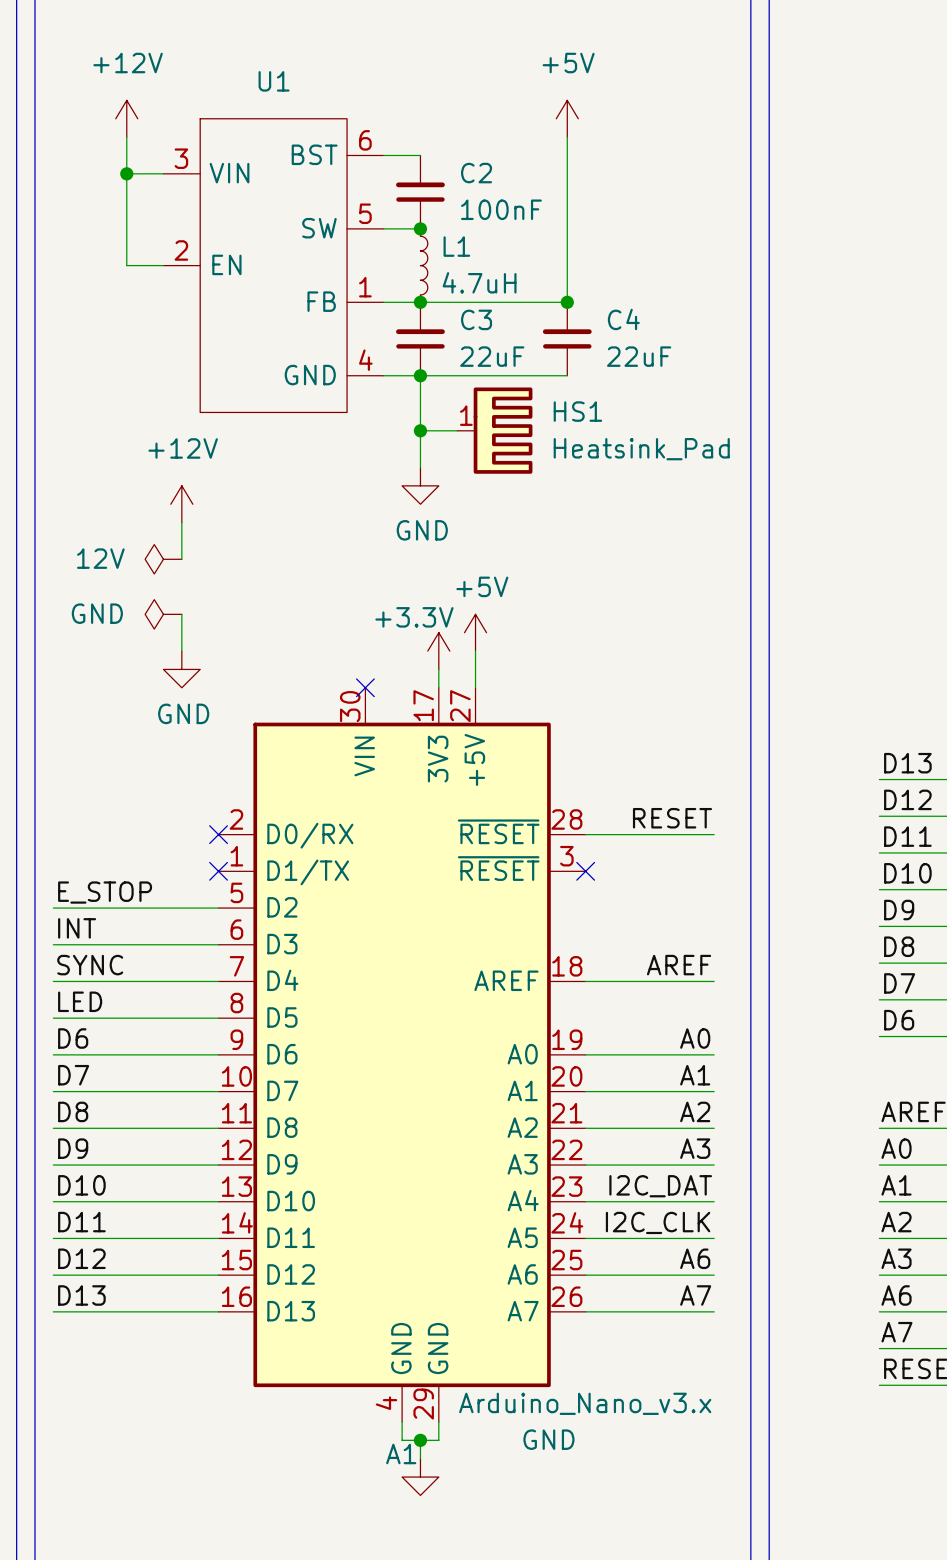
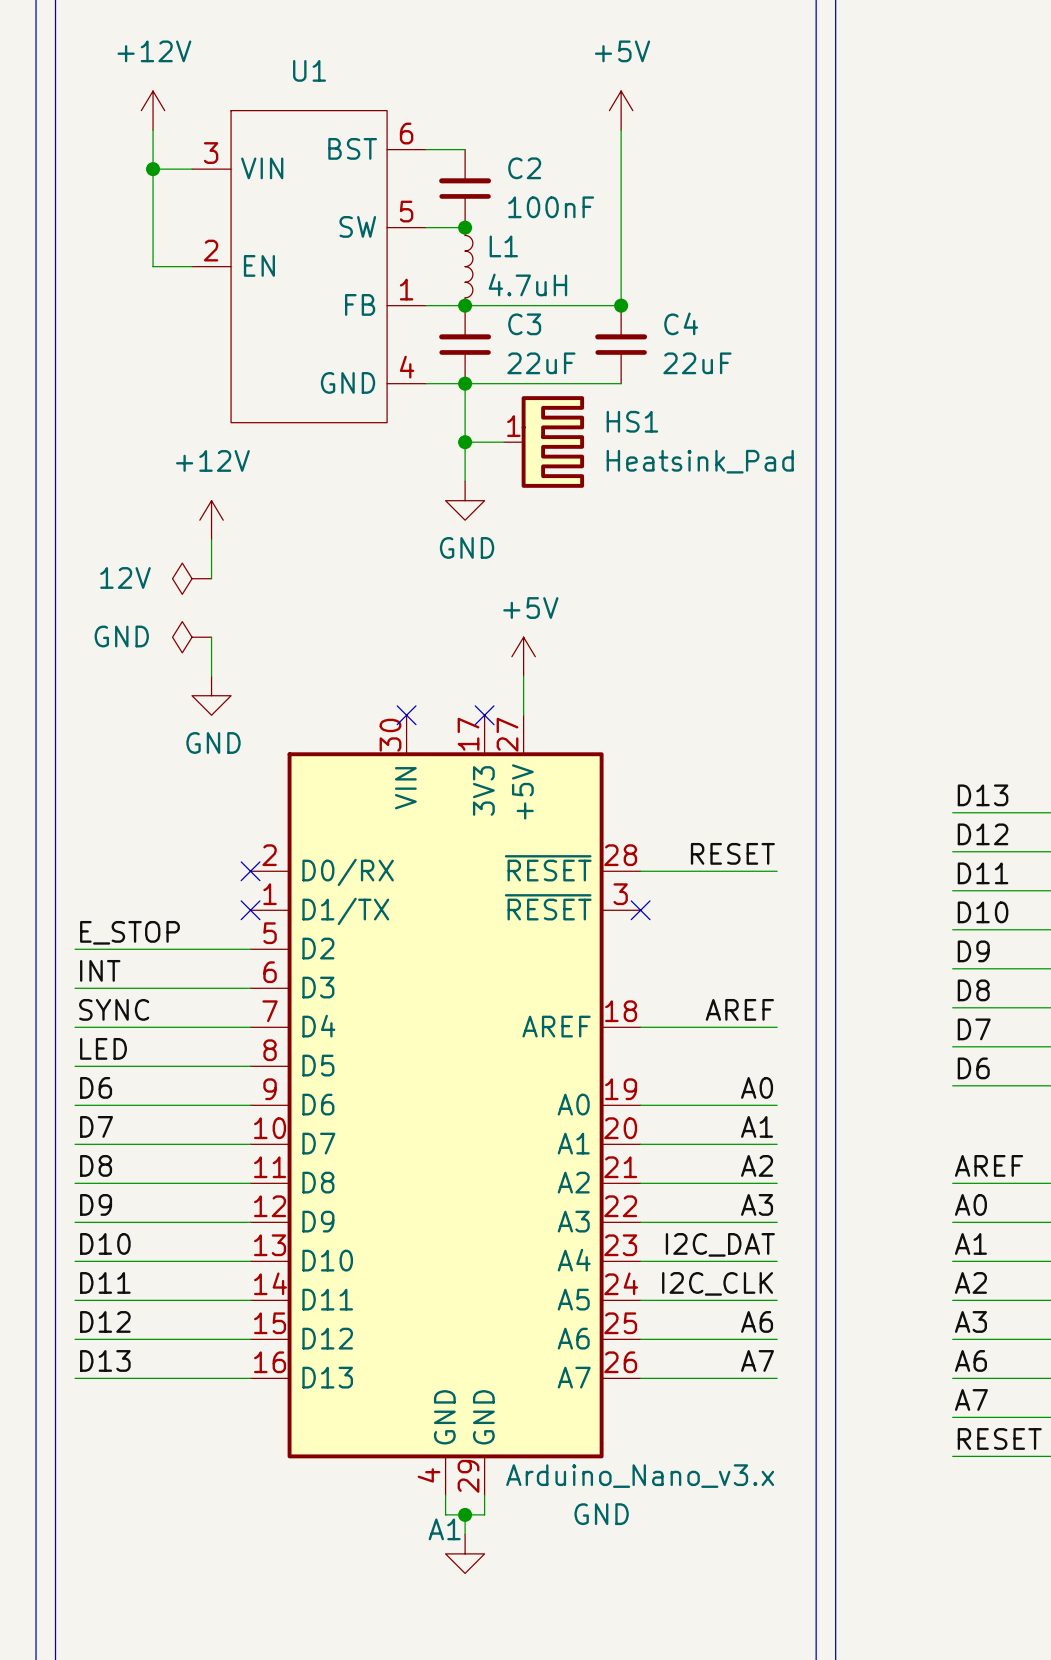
power symbol: +3.3V (438, 651) -> none
wire: (438, 669) (438, 687) -> none
no-connect mark: none -> (484, 715)

